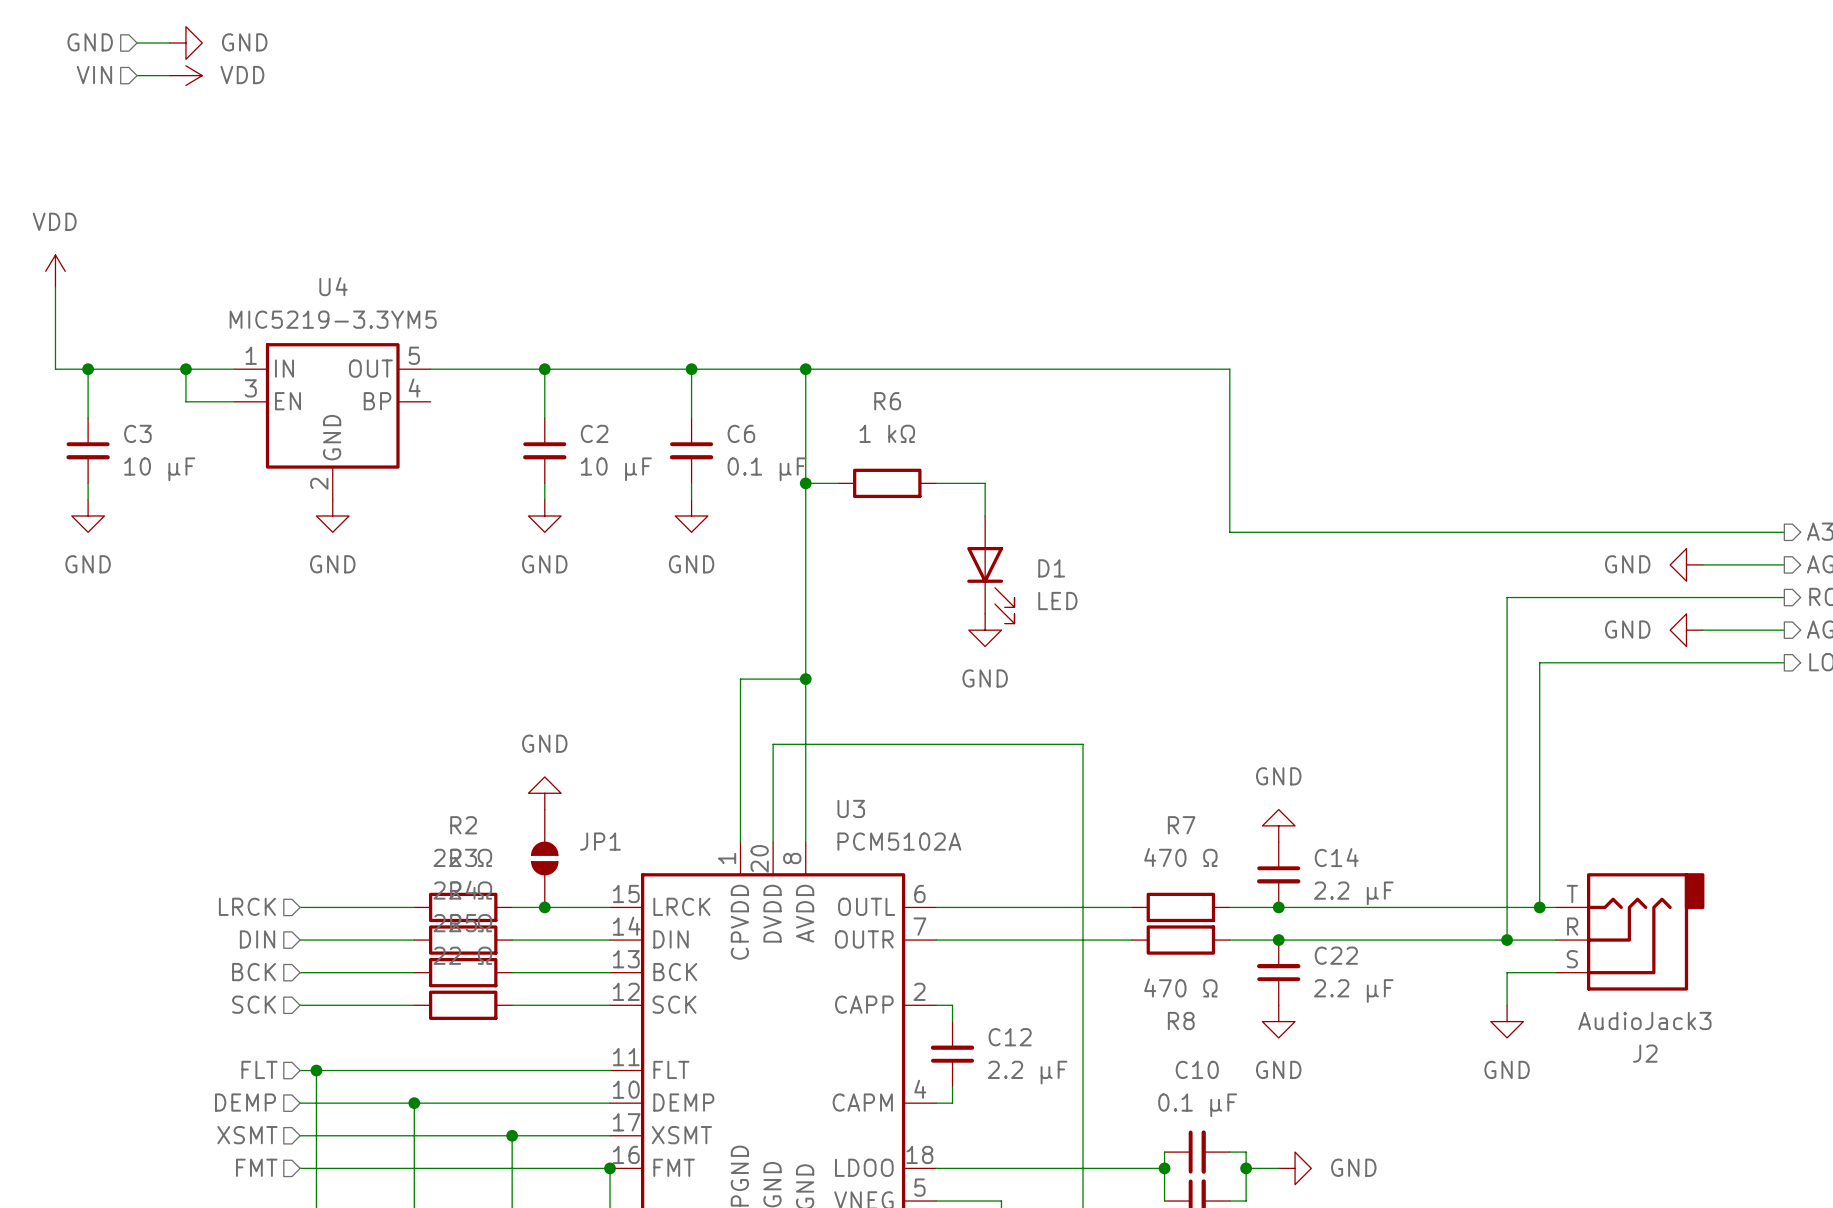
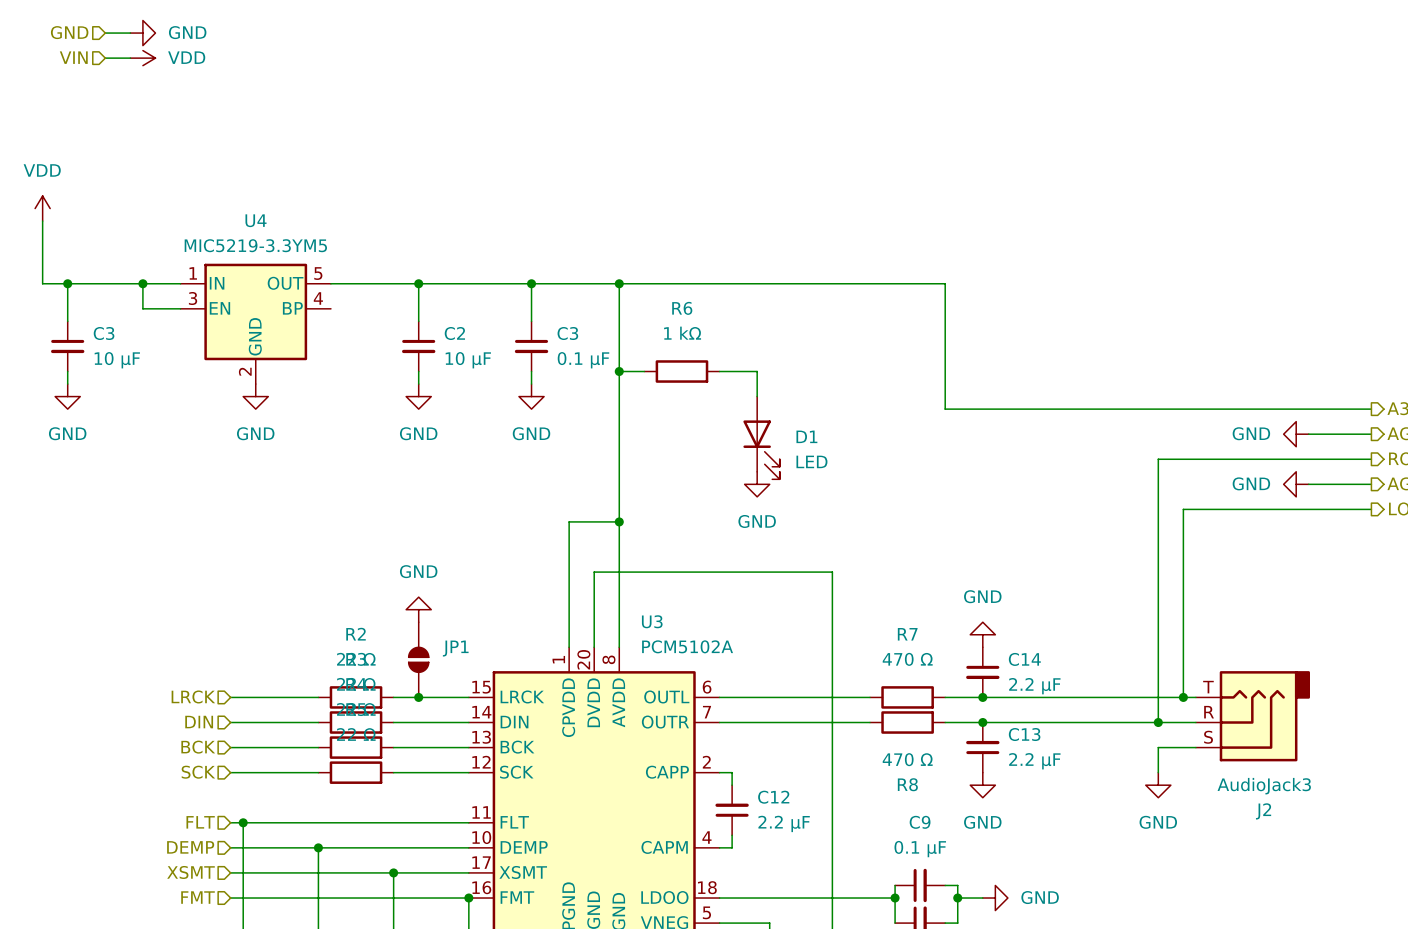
C6 name: C6 (741, 433) -> C3 (567, 333)
C22 name: C22 (1336, 955) -> C13 (1024, 734)
C10 name: C10 (1197, 1069) -> C9 (920, 822)

